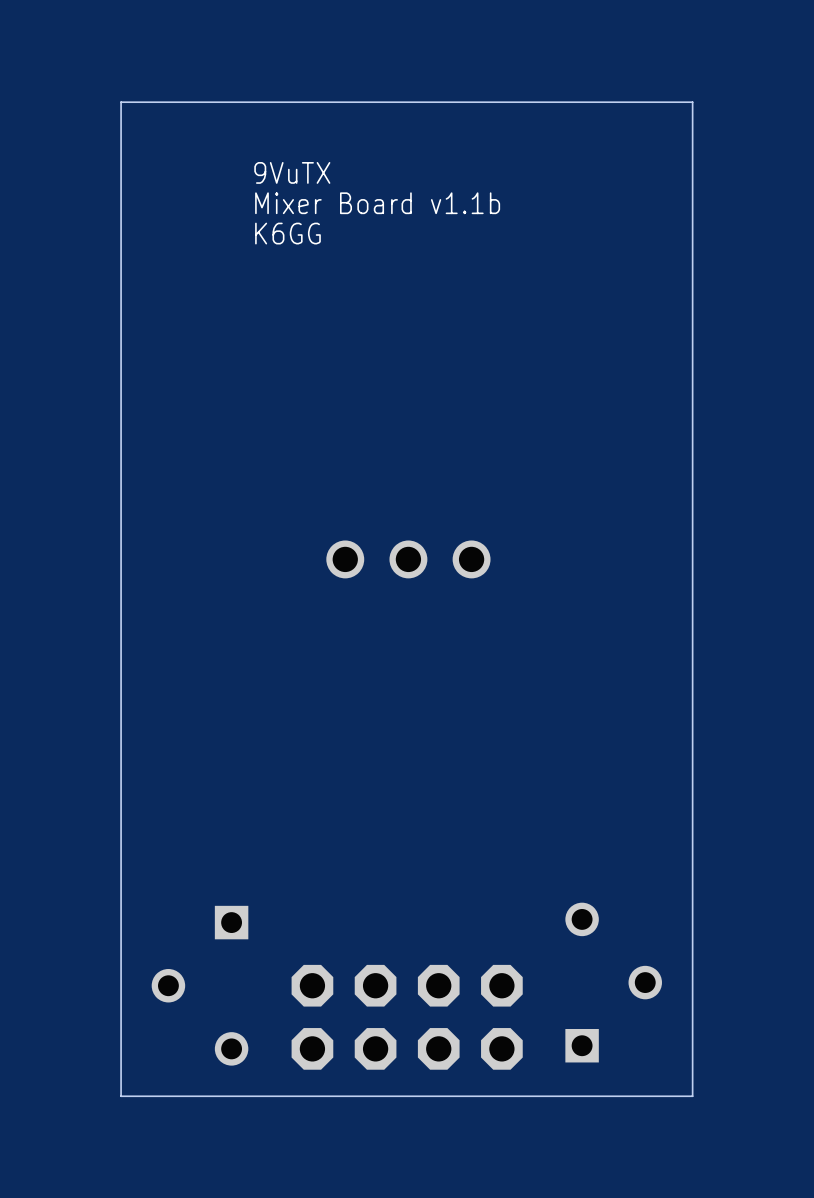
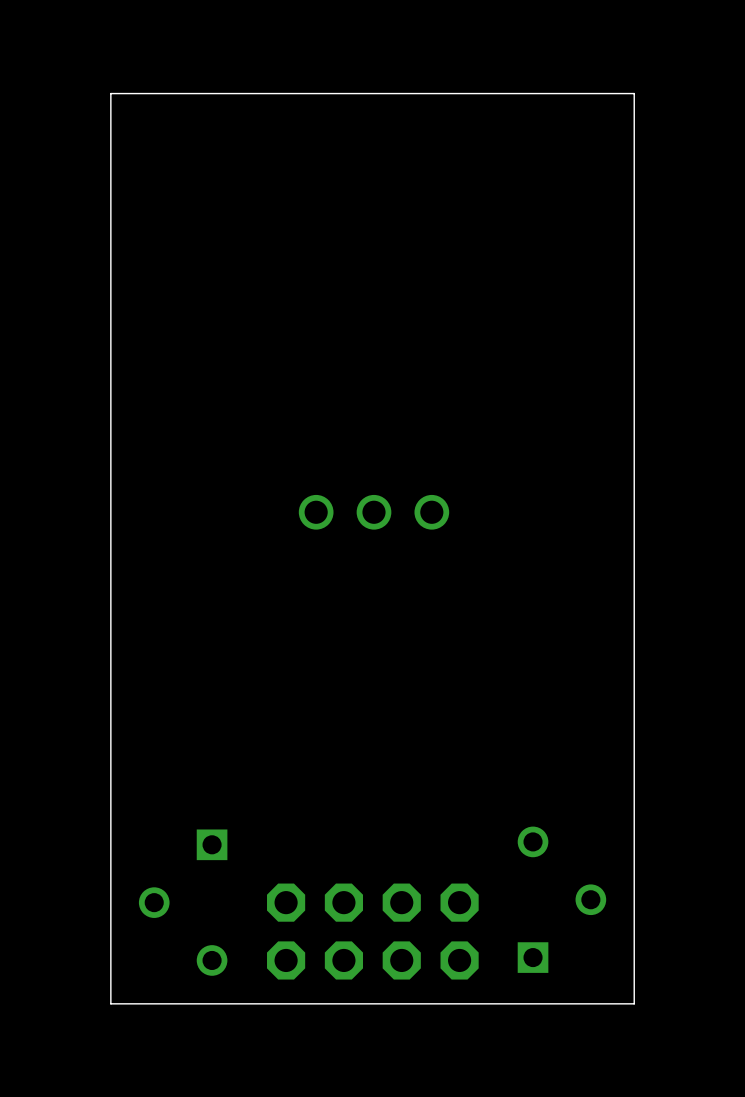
text: 9VuTX (292, 172) -> none
text: Mixer Board v1.1b (377, 203) -> none
text: K6GG (287, 233) -> none

